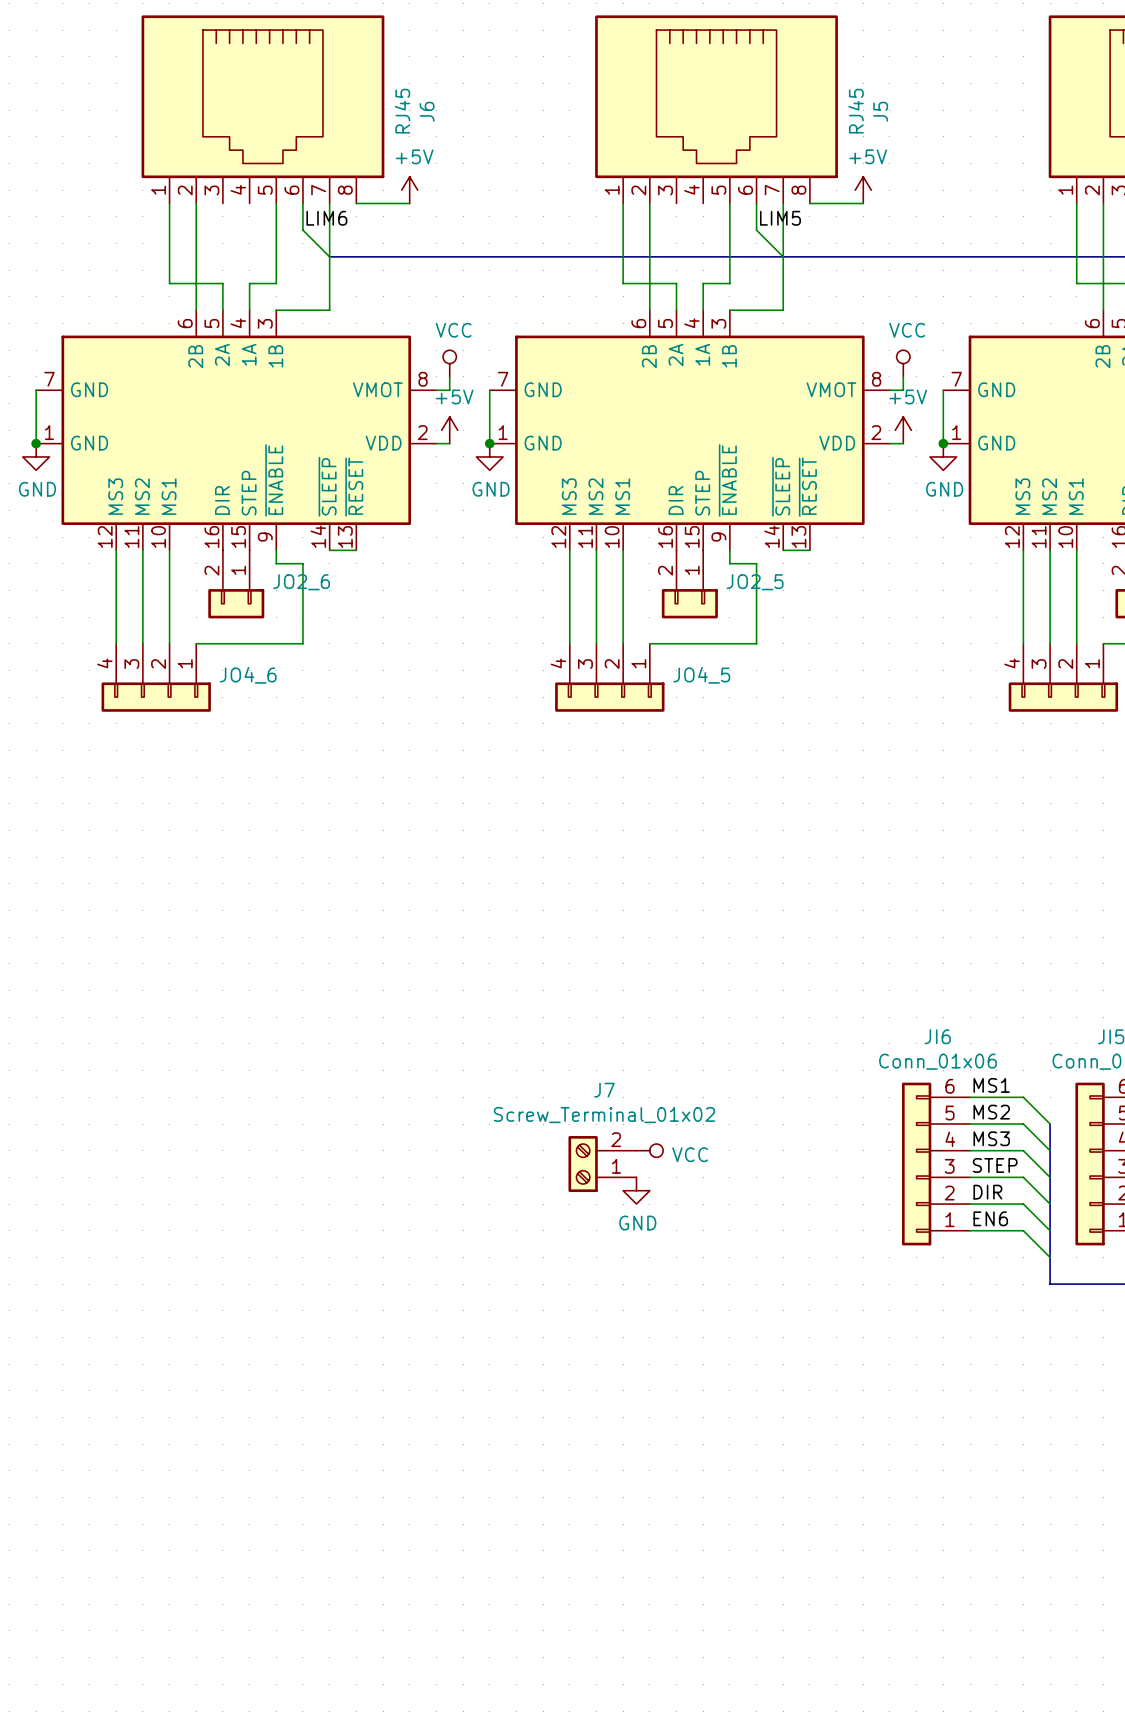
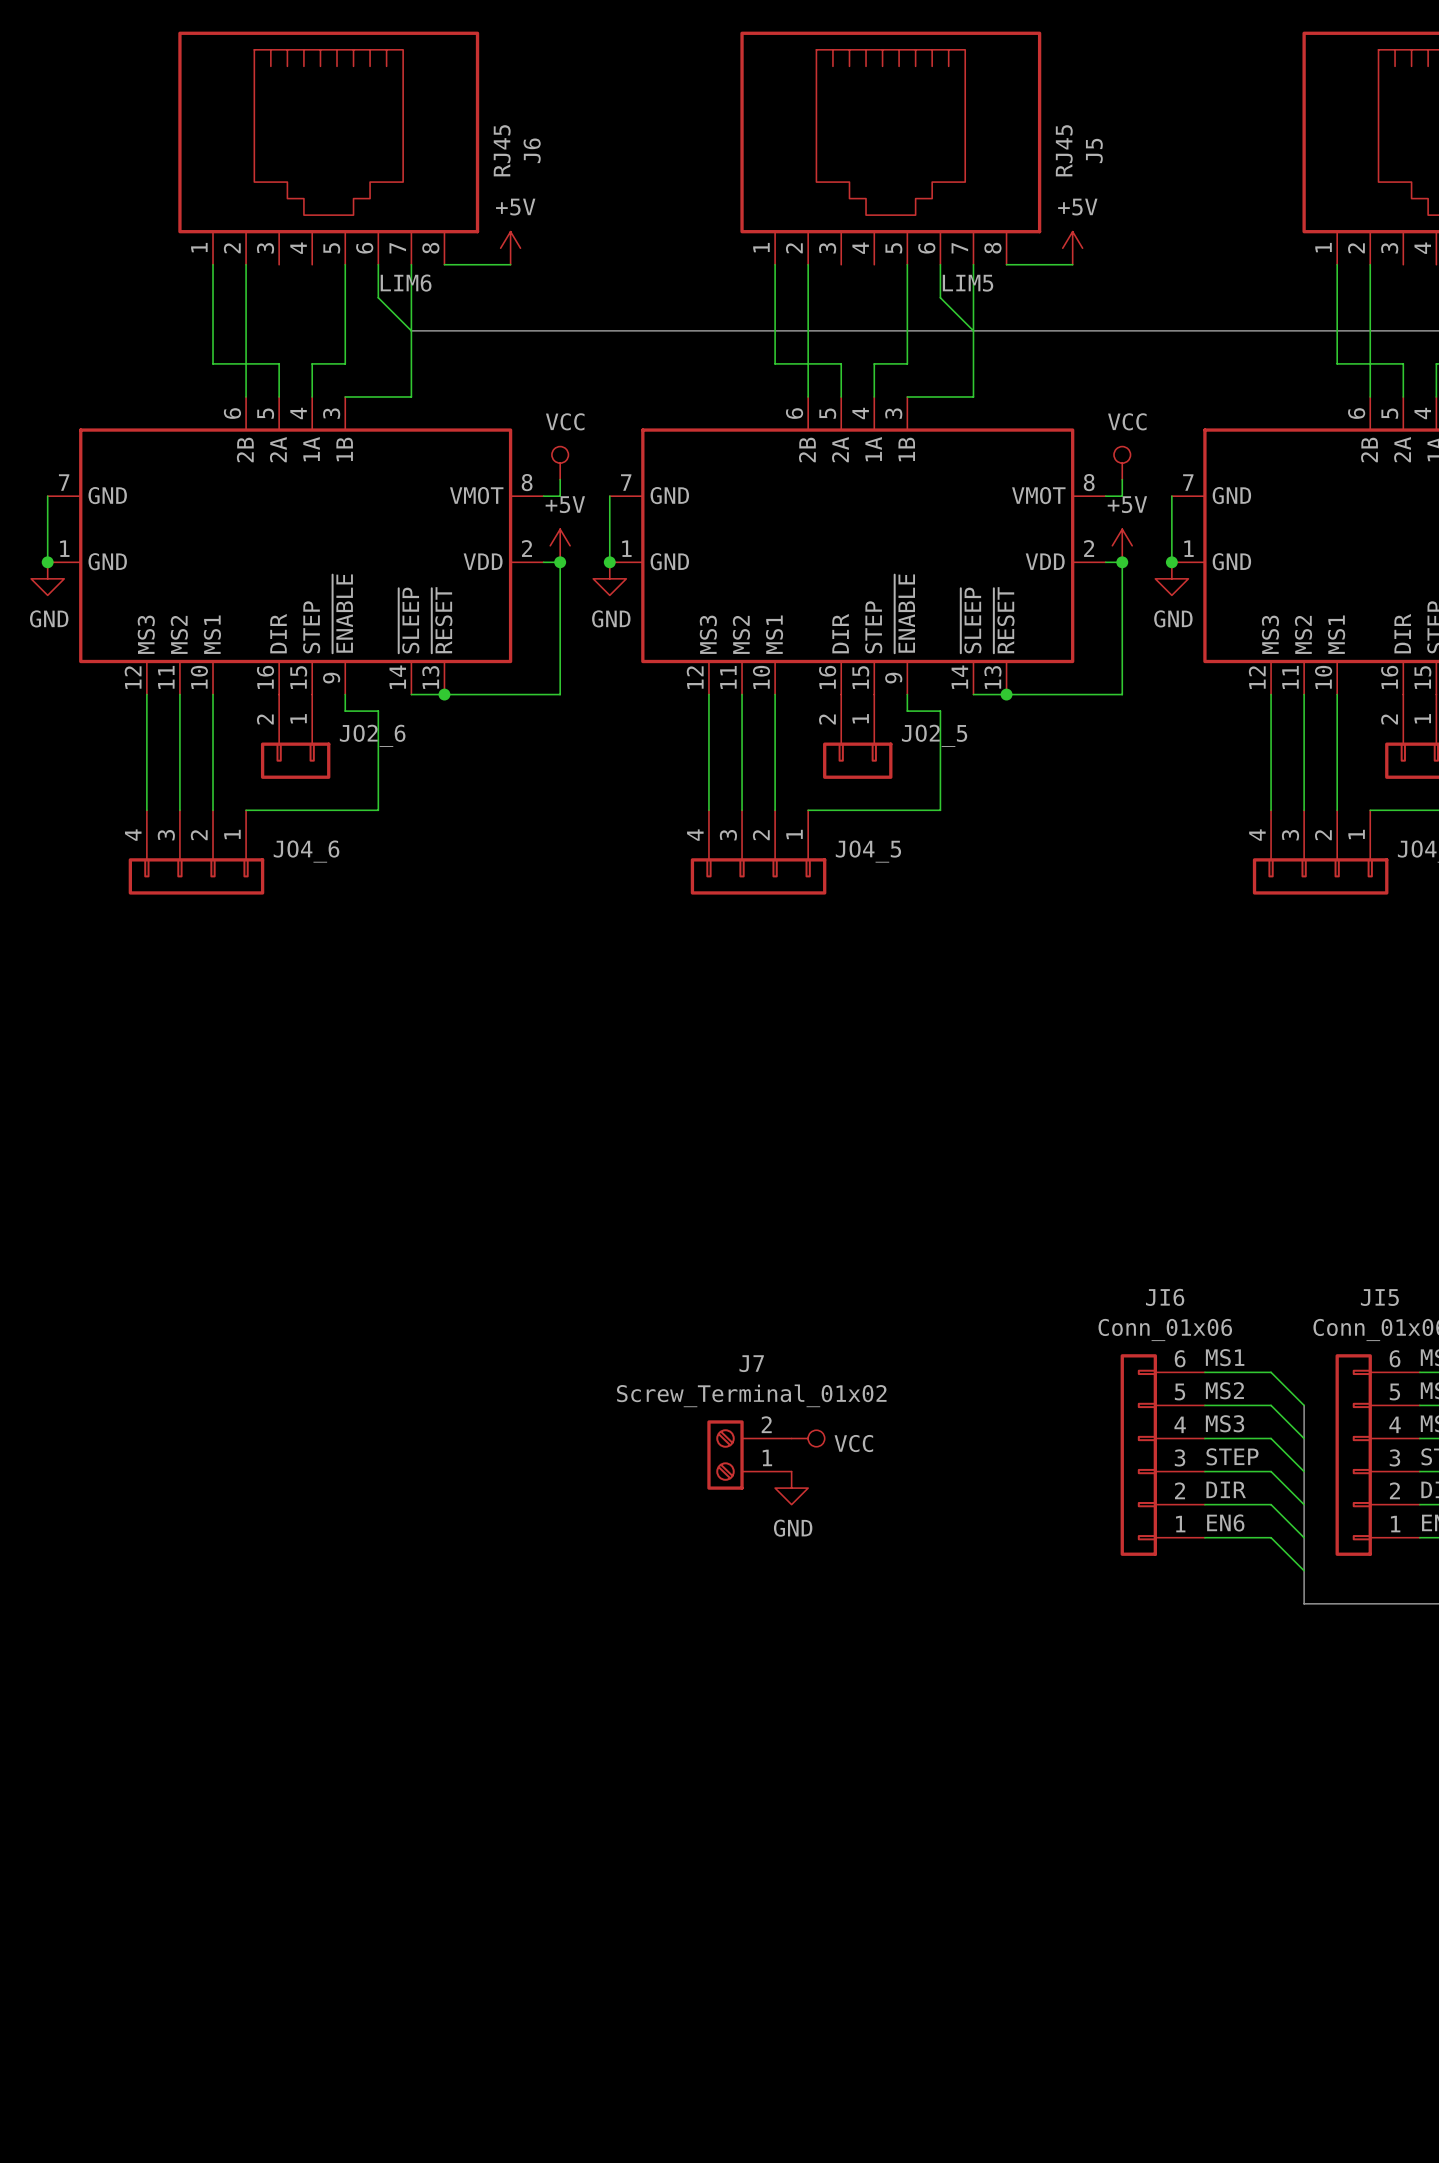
wire: none -> (560, 562) (560, 694) (444, 694)
junction: none -> (560, 562)
wire: none -> (1122, 562) (1122, 694) (1006, 694)
junction: none -> (1122, 562)
junction: none -> (444, 694)
junction: none -> (1006, 694)

